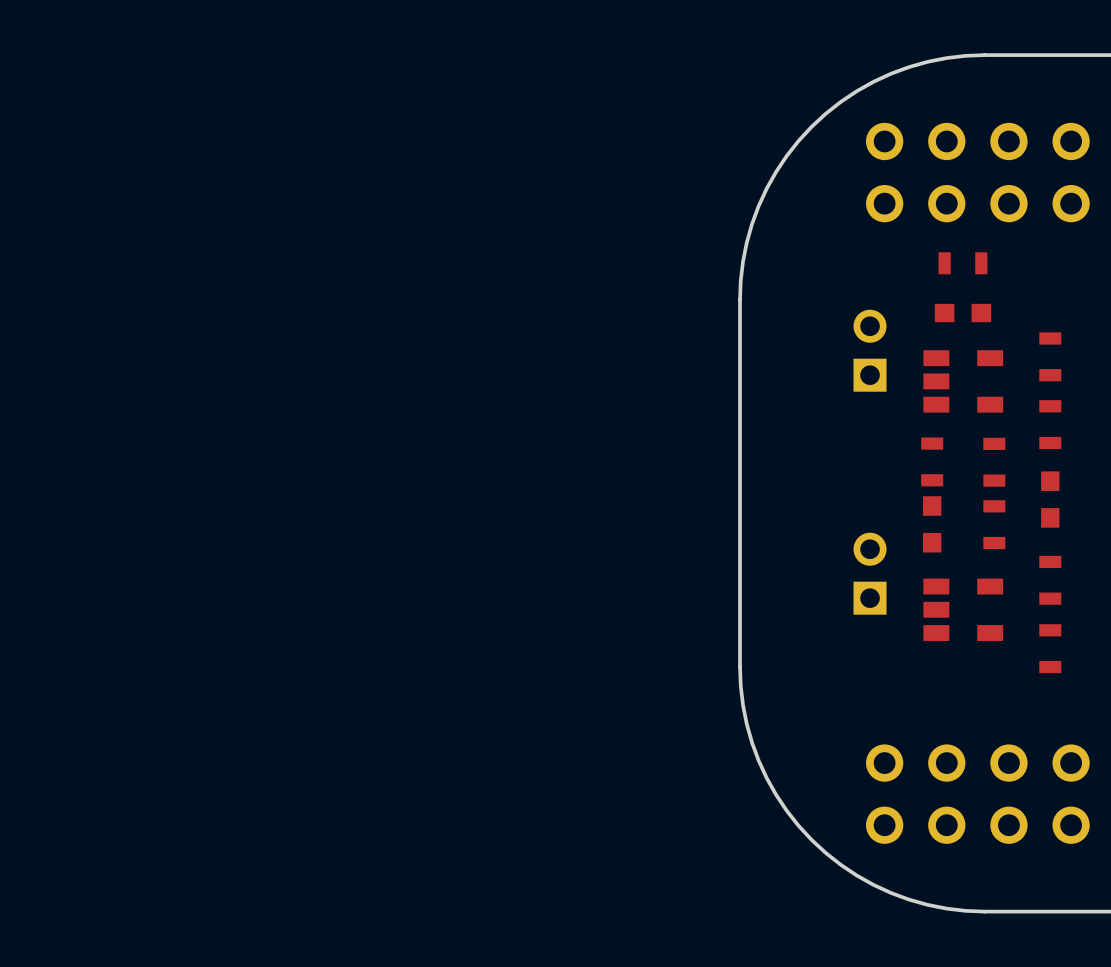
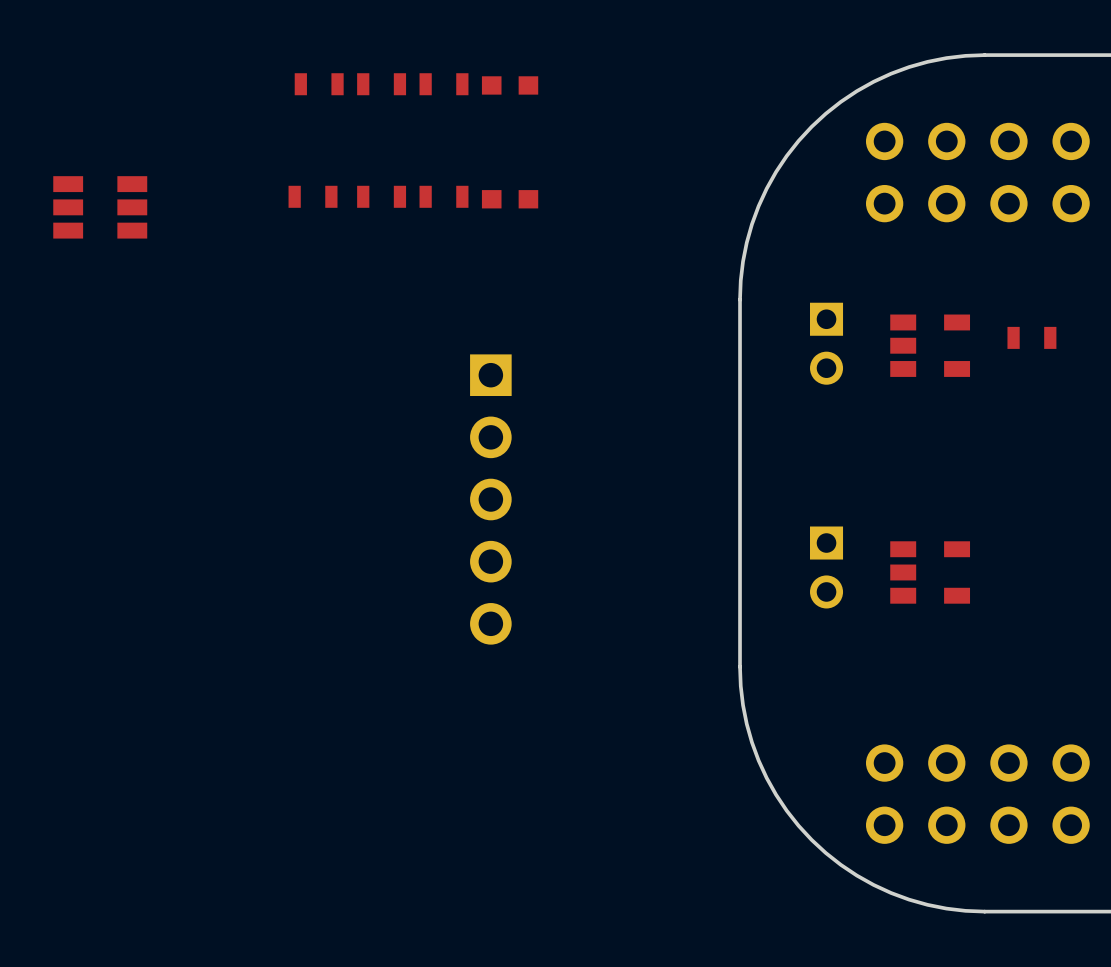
part: none -> (319, 84)
part: none -> (381, 84)
part: none -> (444, 84)
part: none -> (510, 85)
part: none -> (313, 196)
part: none -> (381, 196)
part: none -> (444, 196)
part: none -> (510, 199)
part: none -> (100, 207)
part: (962, 263) -> none
part: (962, 313) -> none
part rotation: 0° (870, 350) -> 180° (826, 343)
part rotation: 0° (1050, 356) -> 90° clockwise (1031, 337)
part position: (963, 381) -> (930, 345)
part: (1050, 424) -> none
part: (932, 461) -> none
part: (994, 462) -> none
part: none -> (490, 499)
part: (1050, 499) -> none
part: (932, 524) -> none
part: (994, 524) -> none
part rotation: 0° (870, 573) -> 180° (826, 567)
part: (1050, 580) -> none
part position: (963, 609) -> (930, 572)
part: (1050, 648) -> none

